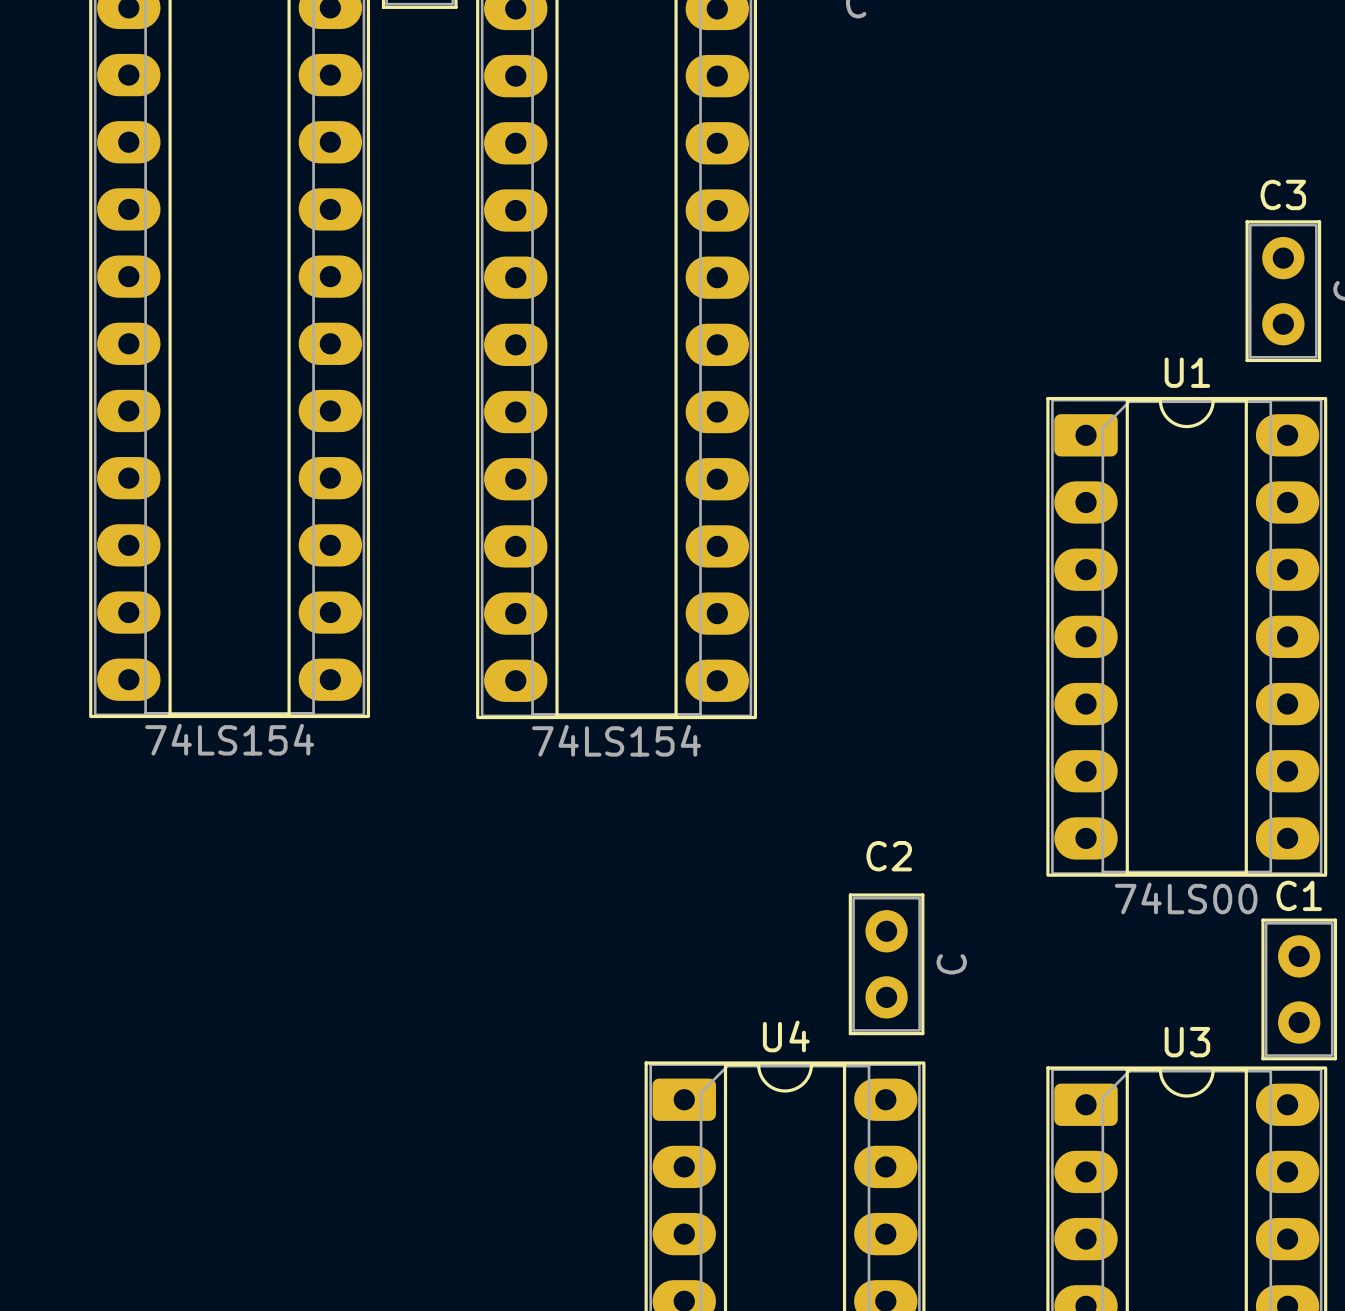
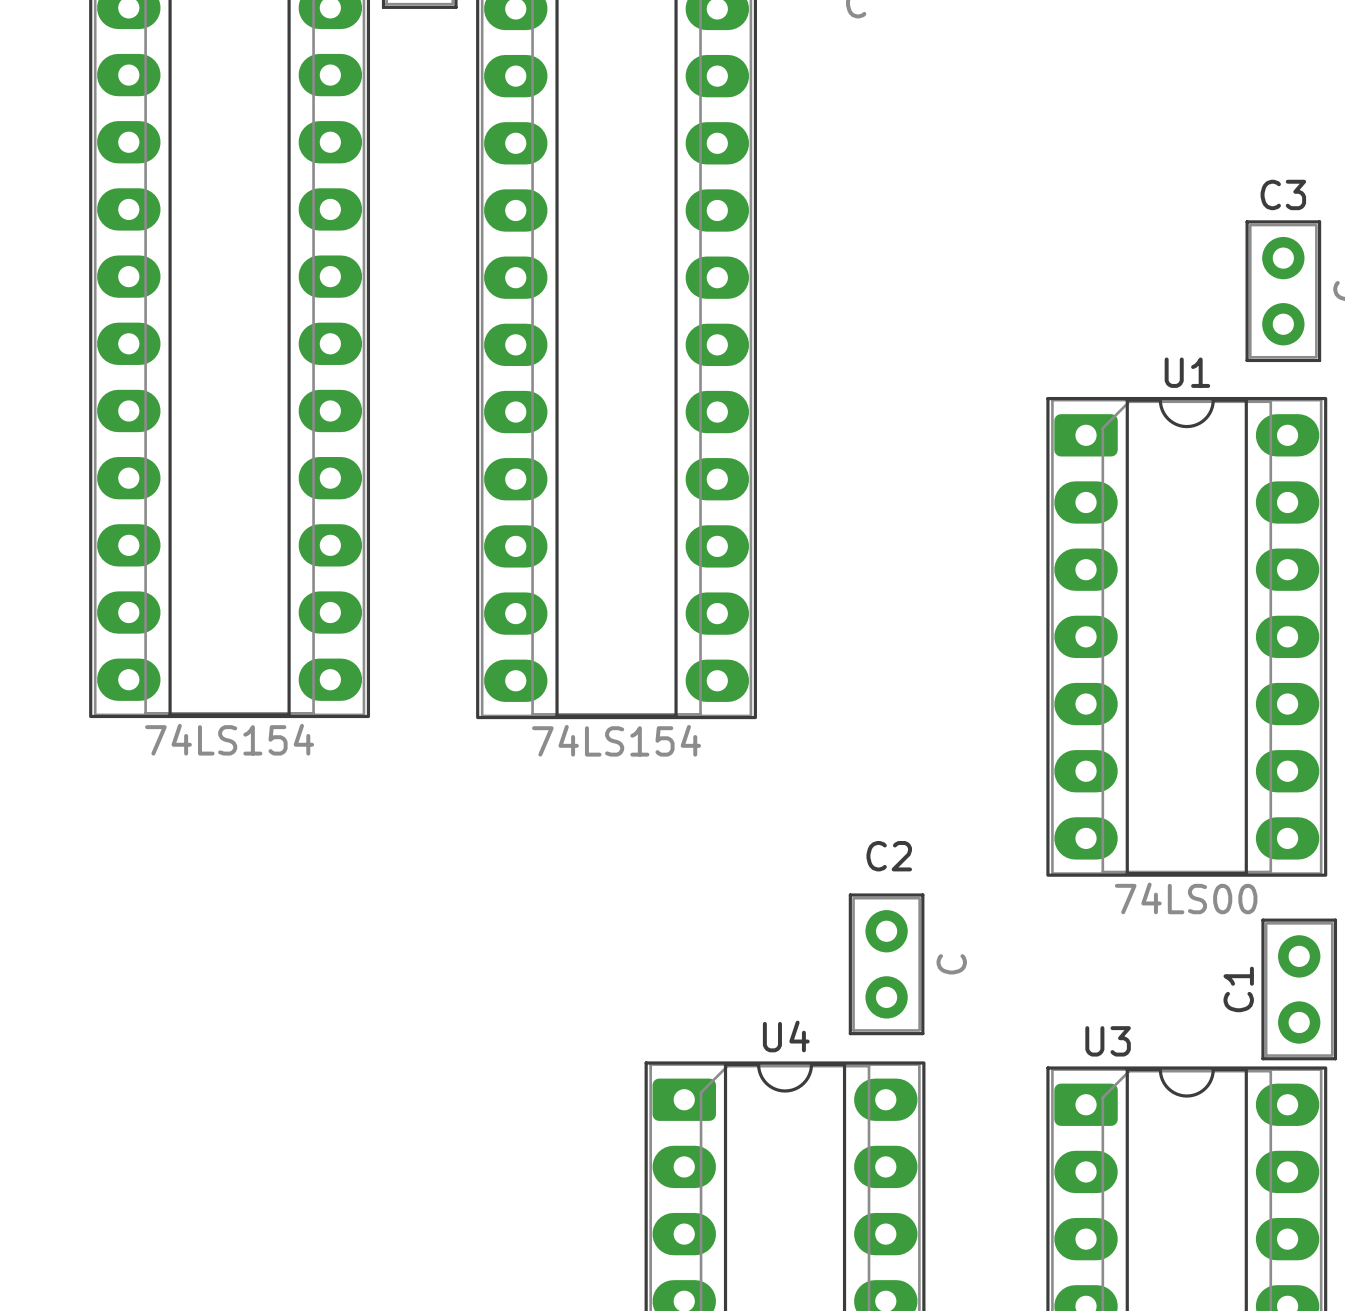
C1 name rotation: 0° (1299, 895) -> 90° counterclockwise (1238, 989)
C1 name position: C1 (1299, 895) -> C1 (1238, 989)
U3 name position: U3 (1187, 1042) -> U3 (1108, 1041)

